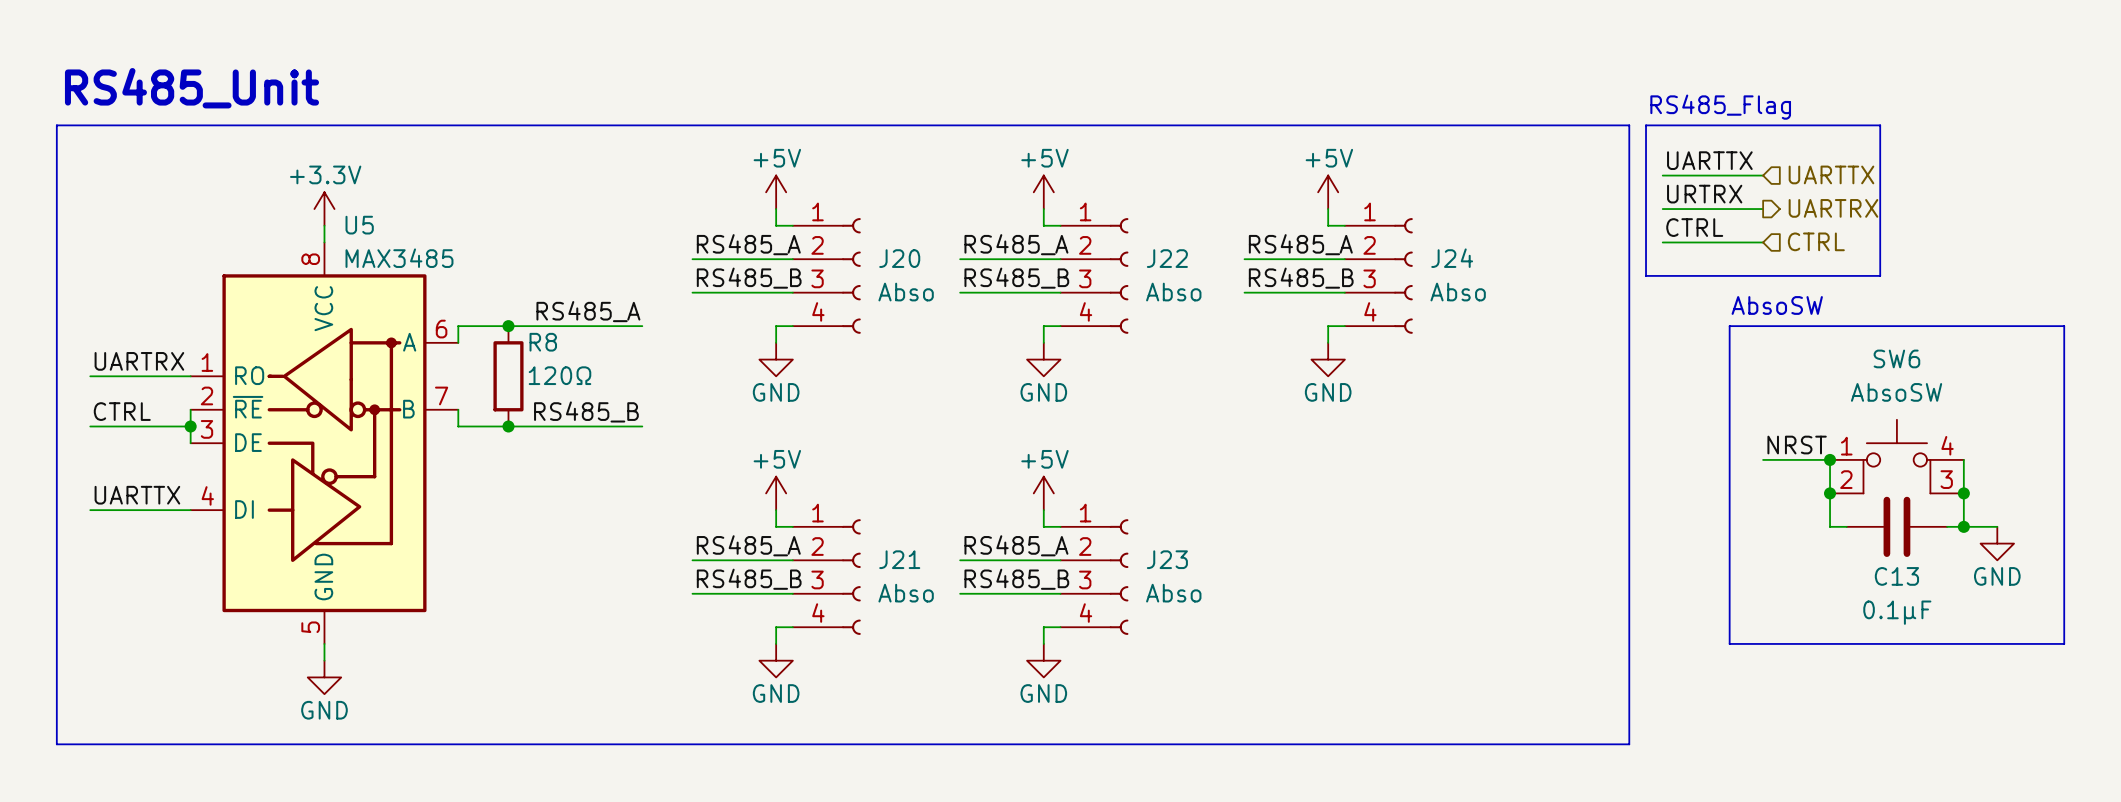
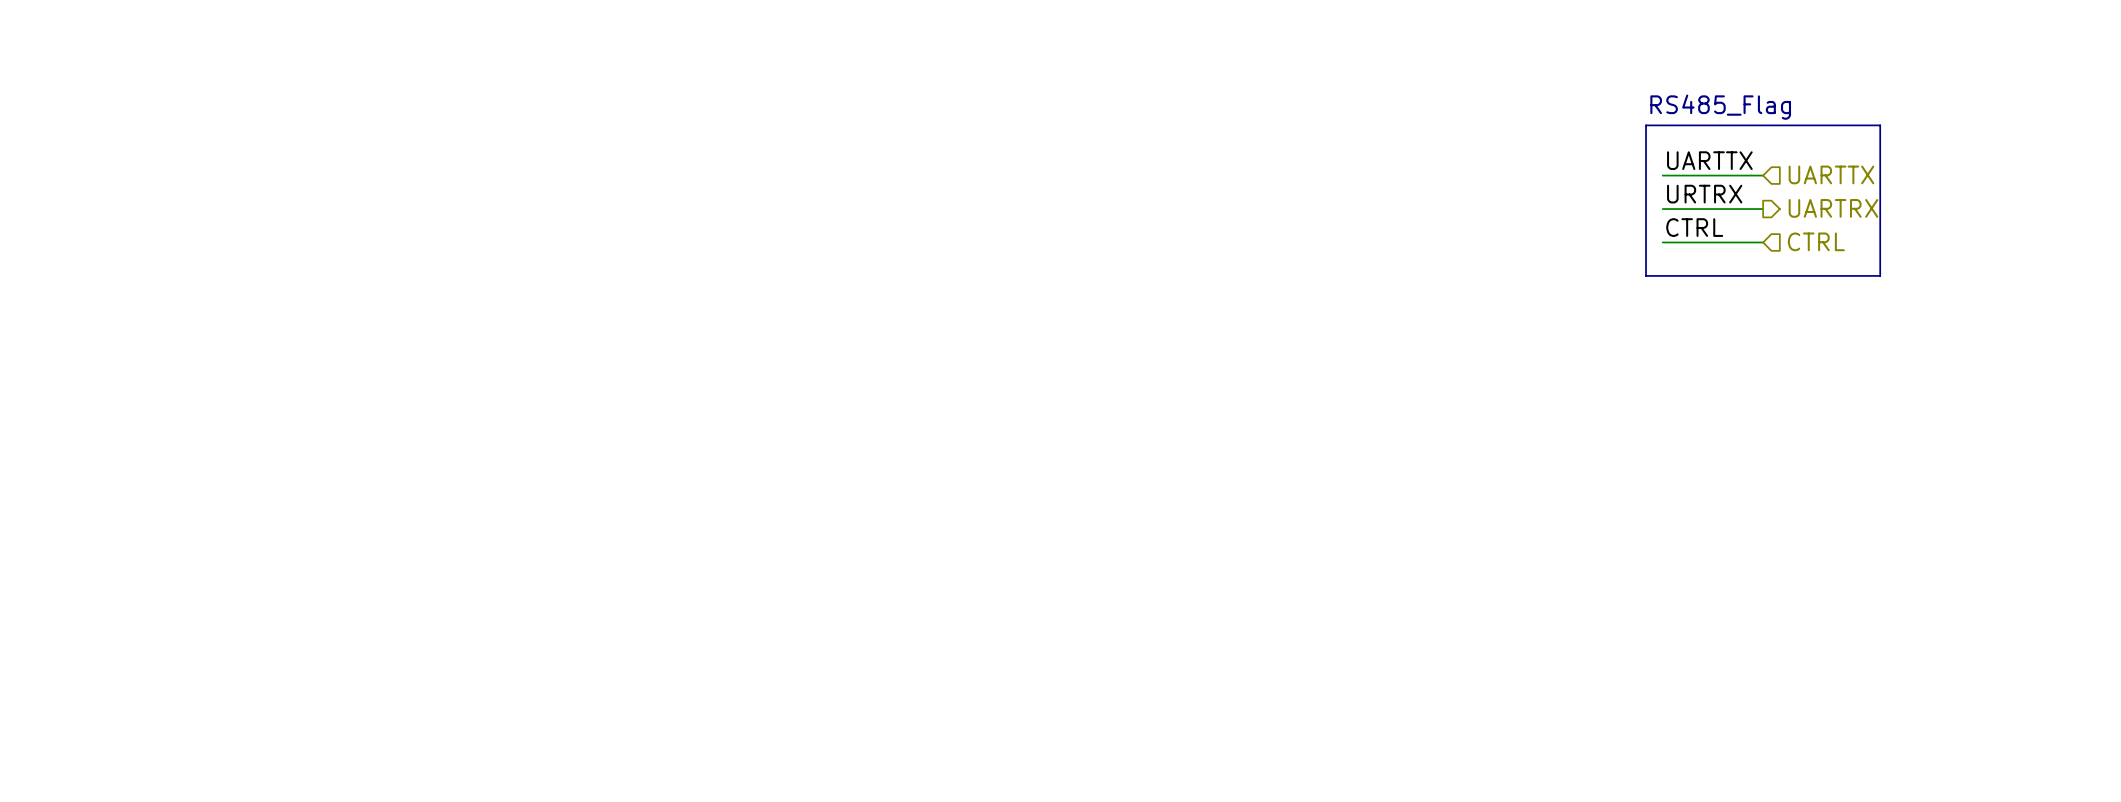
text: RS485_Unit (191, 88) -> none
line: (56, 125) (1629, 125) (1629, 744) (56, 744) (56, 125) -> none
power symbol: +5V (776, 192) -> none
power symbol: +5V (1043, 192) -> none
power symbol: +5V (1328, 192) -> none
power symbol: +3.3V (324, 209) -> none
wire: (776, 209) (776, 225) (792, 225) -> none
wire: (1043, 209) (1043, 225) (1060, 225) -> none
wire: (1328, 209) (1328, 225) (1344, 225) -> none
wire: (324, 225) (324, 242) -> none
label: RS485_A (748, 244) -> none
label: RS485_A (1016, 244) -> none
label: RS485_A (1300, 244) -> none
wire: (692, 259) (792, 259) -> none
wire: (960, 259) (1060, 259) -> none
wire: (1244, 259) (1344, 259) -> none
J20: Abso (826, 275) -> none
J22: Abso (1094, 275) -> none
J24: Abso (1378, 275) -> none
label: RS485_B (749, 278) -> none
label: RS485_B (1016, 278) -> none
label: RS485_B (1301, 278) -> none
wire: (692, 292) (792, 292) -> none
wire: (960, 292) (1060, 292) -> none
wire: (1244, 292) (1344, 292) -> none
text: AbsoSW (1777, 305) -> none
label: RS485_A (588, 311) -> none
junction: (508, 326) -> none
wire: (642, 326) (458, 326) (458, 342) -> none
wire: (792, 326) (776, 326) (776, 342) -> none
wire: (1060, 326) (1043, 326) (1043, 342) -> none
wire: (1344, 326) (1328, 326) (1328, 342) -> none
line: (1729, 326) (2064, 326) (2064, 643) (1729, 643) (1729, 326) -> none
power symbol: GND (776, 359) -> none
power symbol: GND (1043, 359) -> none
power symbol: GND (1328, 359) -> none
label: UARTRX (139, 361) -> none
wire: (90, 376) (190, 376) -> none
R8: 120Ω (508, 376) -> none
wire: (190, 409) (190, 443) -> none
wire: (458, 409) (458, 426) (642, 426) -> none
label: CTRL (122, 411) -> none
label: RS485_B (586, 411) -> none
wire: (90, 426) (190, 426) -> none
junction: (190, 426) -> none
junction: (508, 426) -> none
U5: MAX3485 (324, 443) -> none
label: NRST (1797, 445) -> none
SW6: AbsoSW (1896, 456) -> none
wire: (1763, 459) (1830, 459) (1830, 526) (1846, 526) -> none
junction: (1830, 459) -> none
wire: (1963, 459) (1963, 526) -> none
power symbol: +5V (776, 493) -> none
power symbol: +5V (1043, 493) -> none
junction: (1830, 493) -> none
junction: (1963, 493) -> none
label: UARTTX (137, 495) -> none
wire: (90, 510) (190, 510) -> none
wire: (776, 510) (776, 526) (792, 526) -> none
wire: (1043, 510) (1043, 526) (1060, 526) -> none
C13: 0.1μF (1896, 526) -> none
wire: (1947, 526) (1997, 526) -> none
junction: (1963, 526) -> none
power symbol: GND (1997, 543) -> none
label: RS485_A (748, 545) -> none
label: RS485_A (1016, 545) -> none
wire: (692, 560) (792, 560) -> none
wire: (960, 560) (1060, 560) -> none
J21: Abso (826, 577) -> none
J23: Abso (1094, 577) -> none
label: RS485_B (749, 579) -> none
label: RS485_B (1016, 579) -> none
wire: (692, 593) (792, 593) -> none
wire: (960, 593) (1060, 593) -> none
wire: (792, 627) (776, 627) (776, 643) -> none
wire: (1060, 627) (1043, 627) (1043, 643) -> none
wire: (324, 643) (324, 660) -> none
power symbol: GND (776, 660) -> none
power symbol: GND (1043, 660) -> none
power symbol: GND (324, 677) -> none

